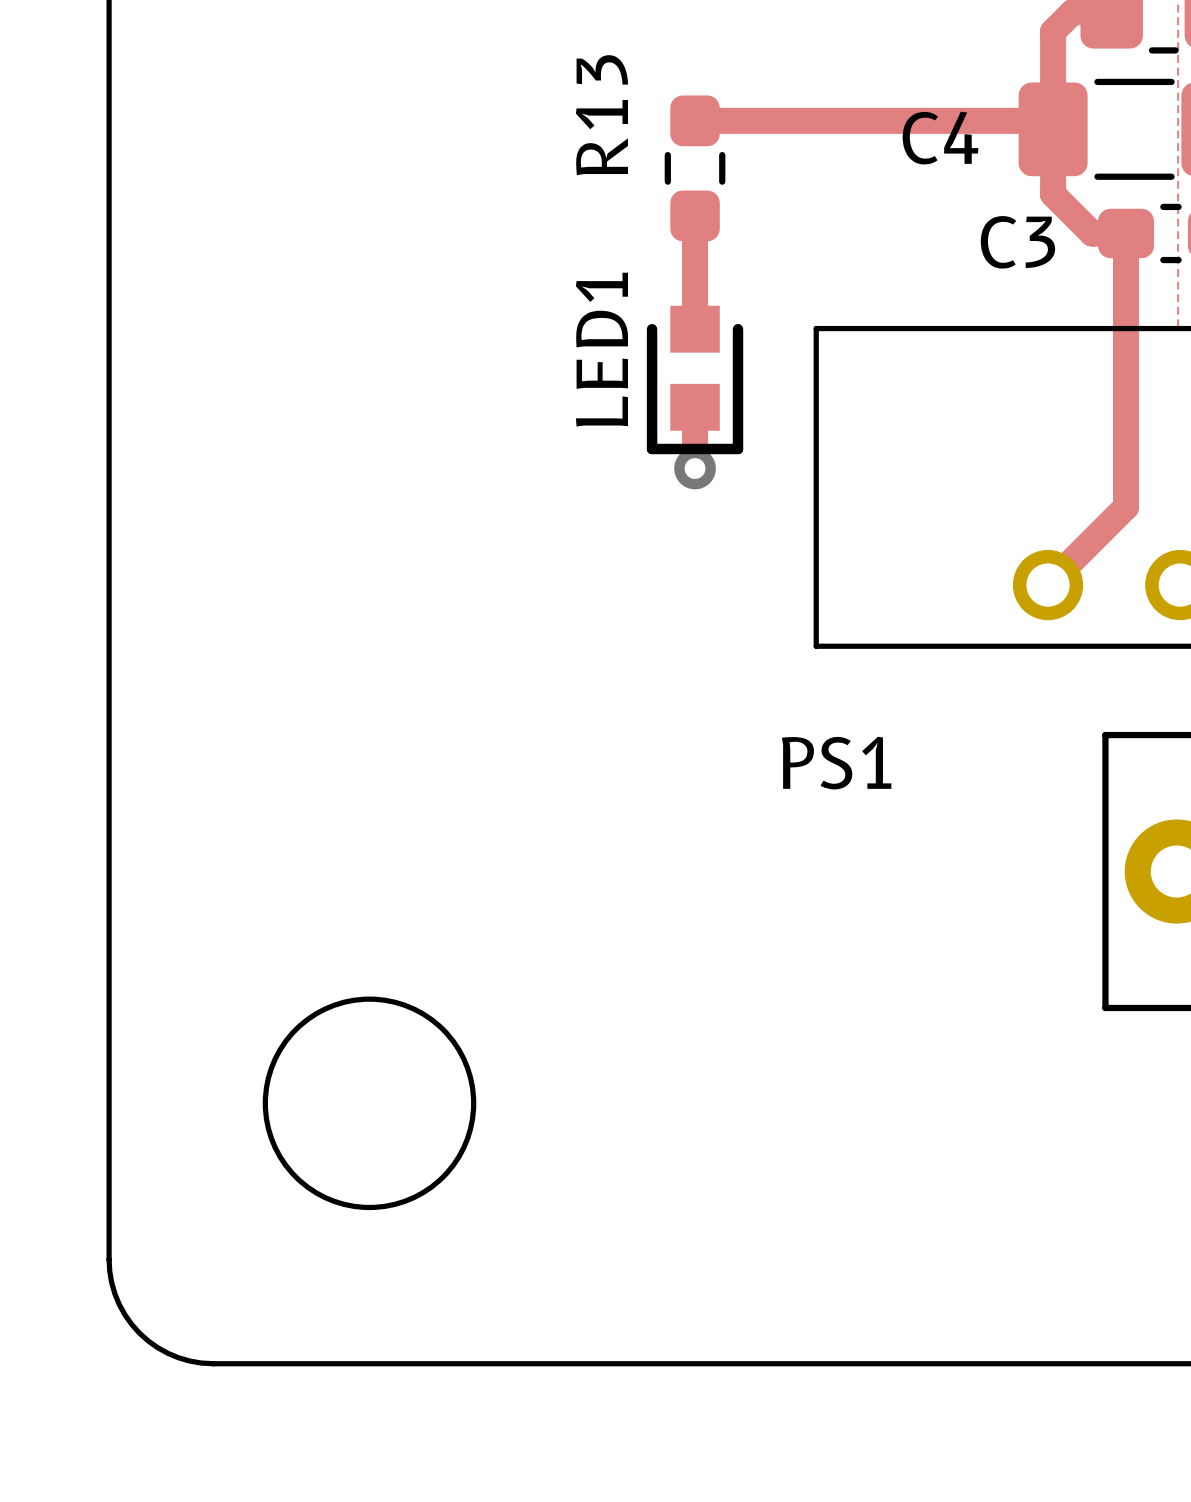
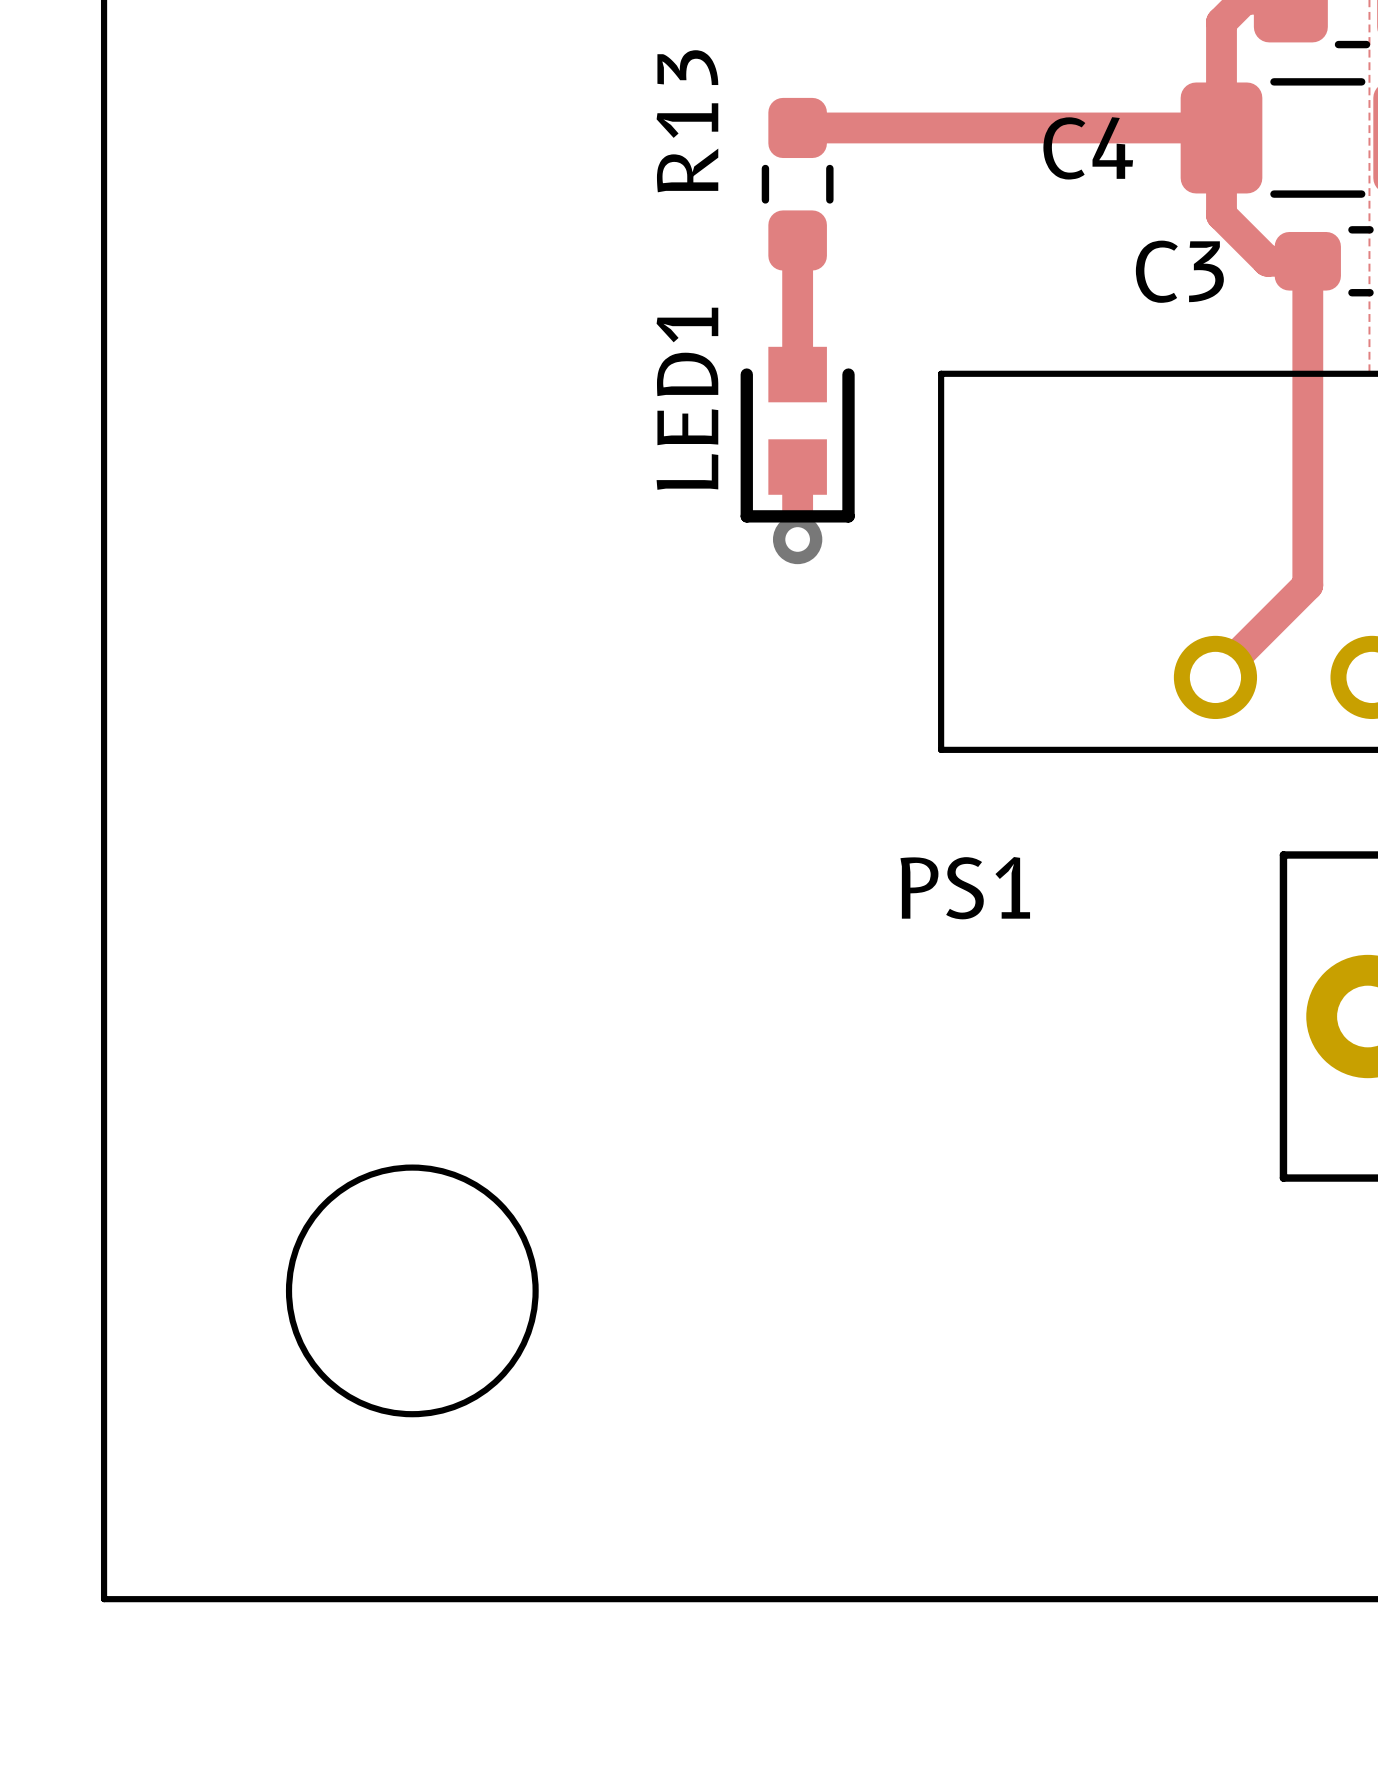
board edge: (109, 1259) (114, 1293) (125, 1314) (139, 1333) (157, 1347) (178, 1357) (213, 1363) -> (104, 1475) (104, 1599) (227, 1599)

